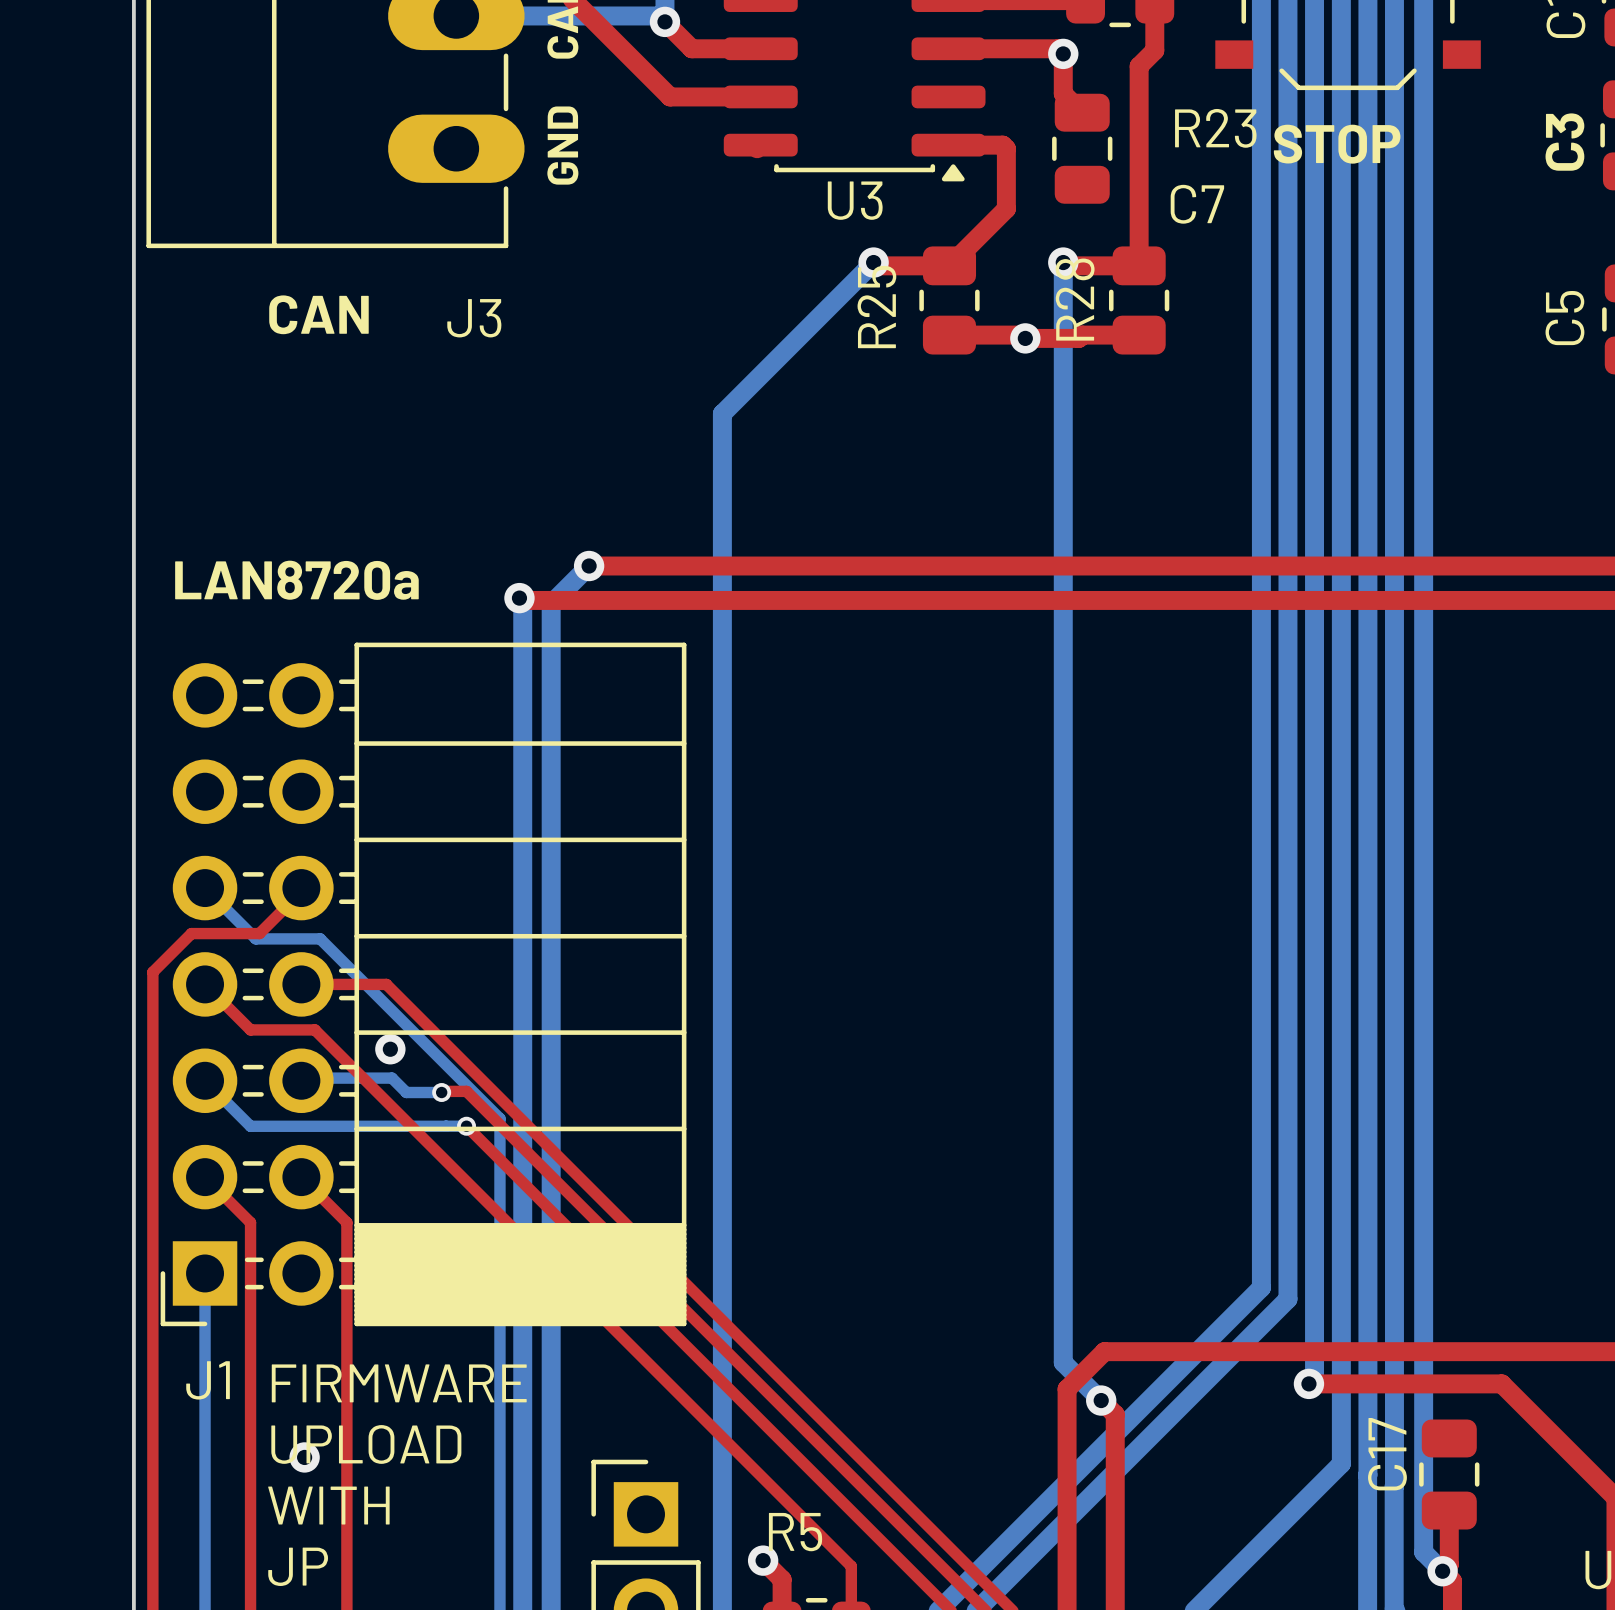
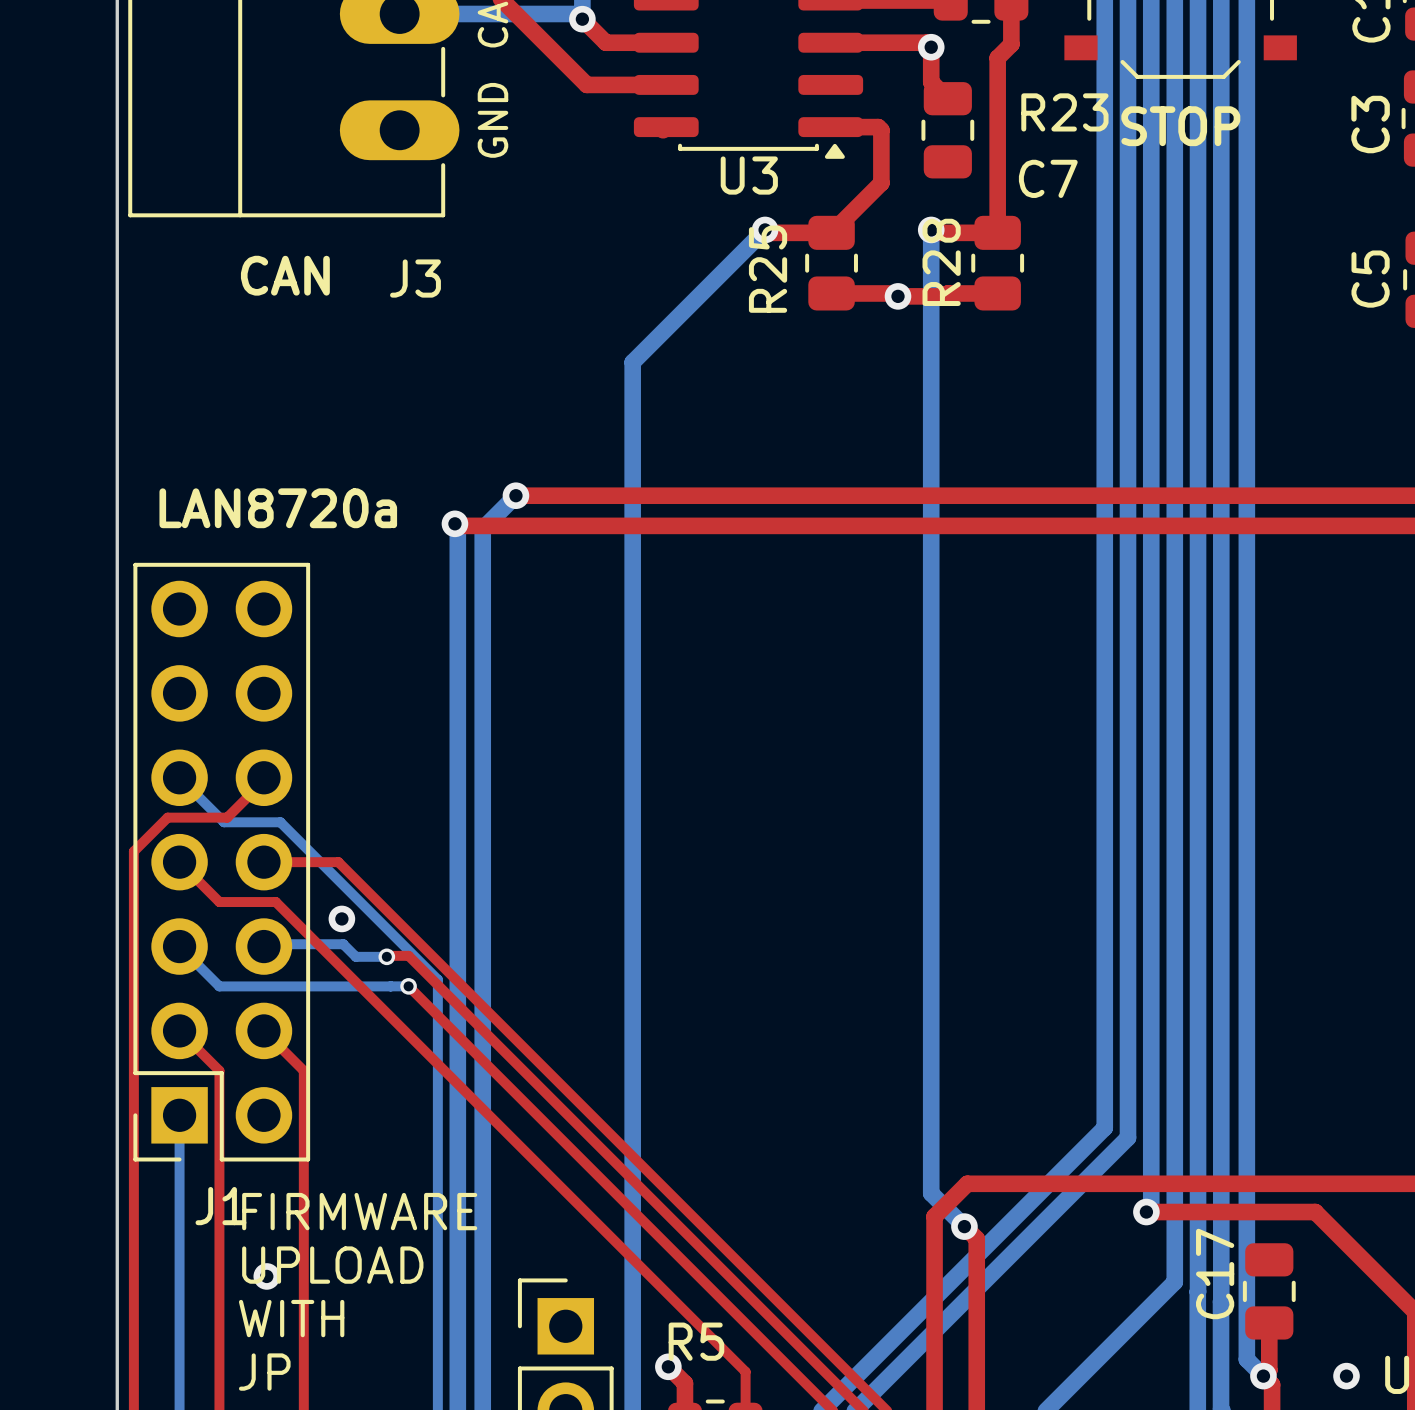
J1 footprint: [160, 642, 687, 1327] -> [133, 562, 311, 1162]
J1 name position: J1 (208, 1380) -> J1 (220, 1206)
via: none -> (1346, 1376)

